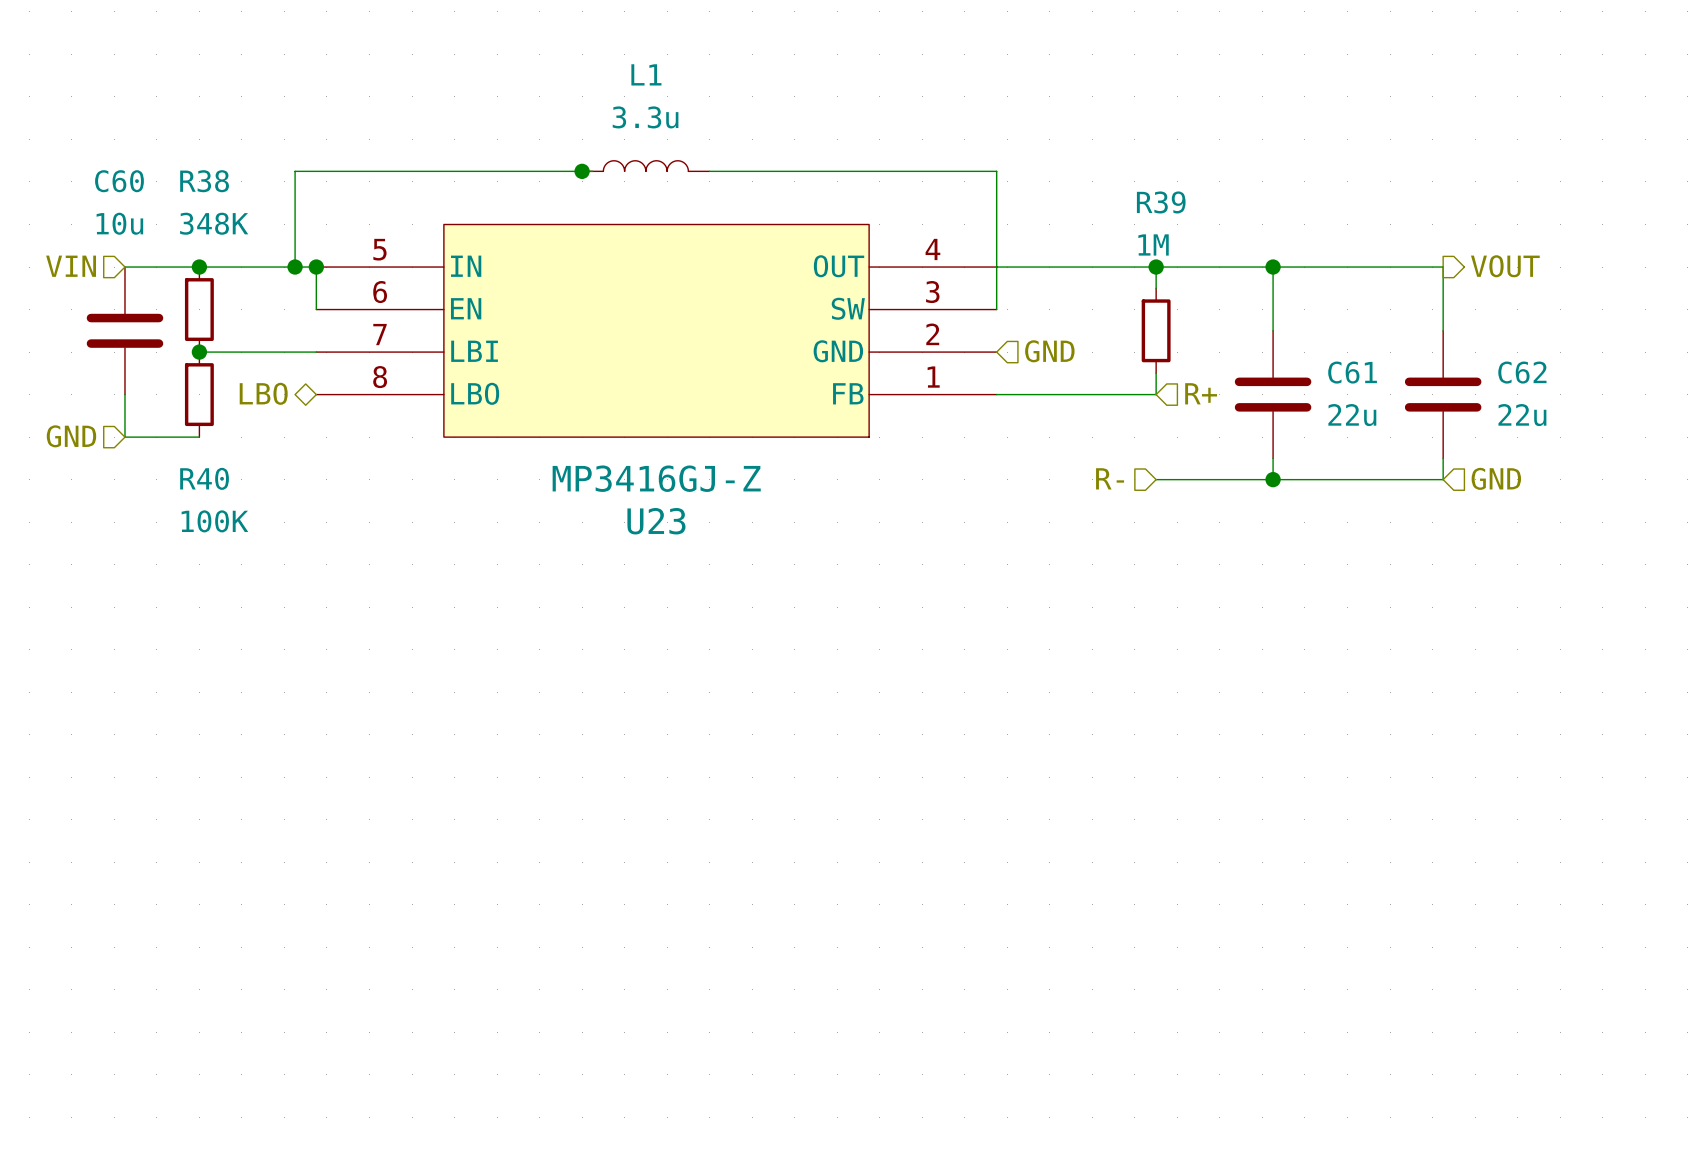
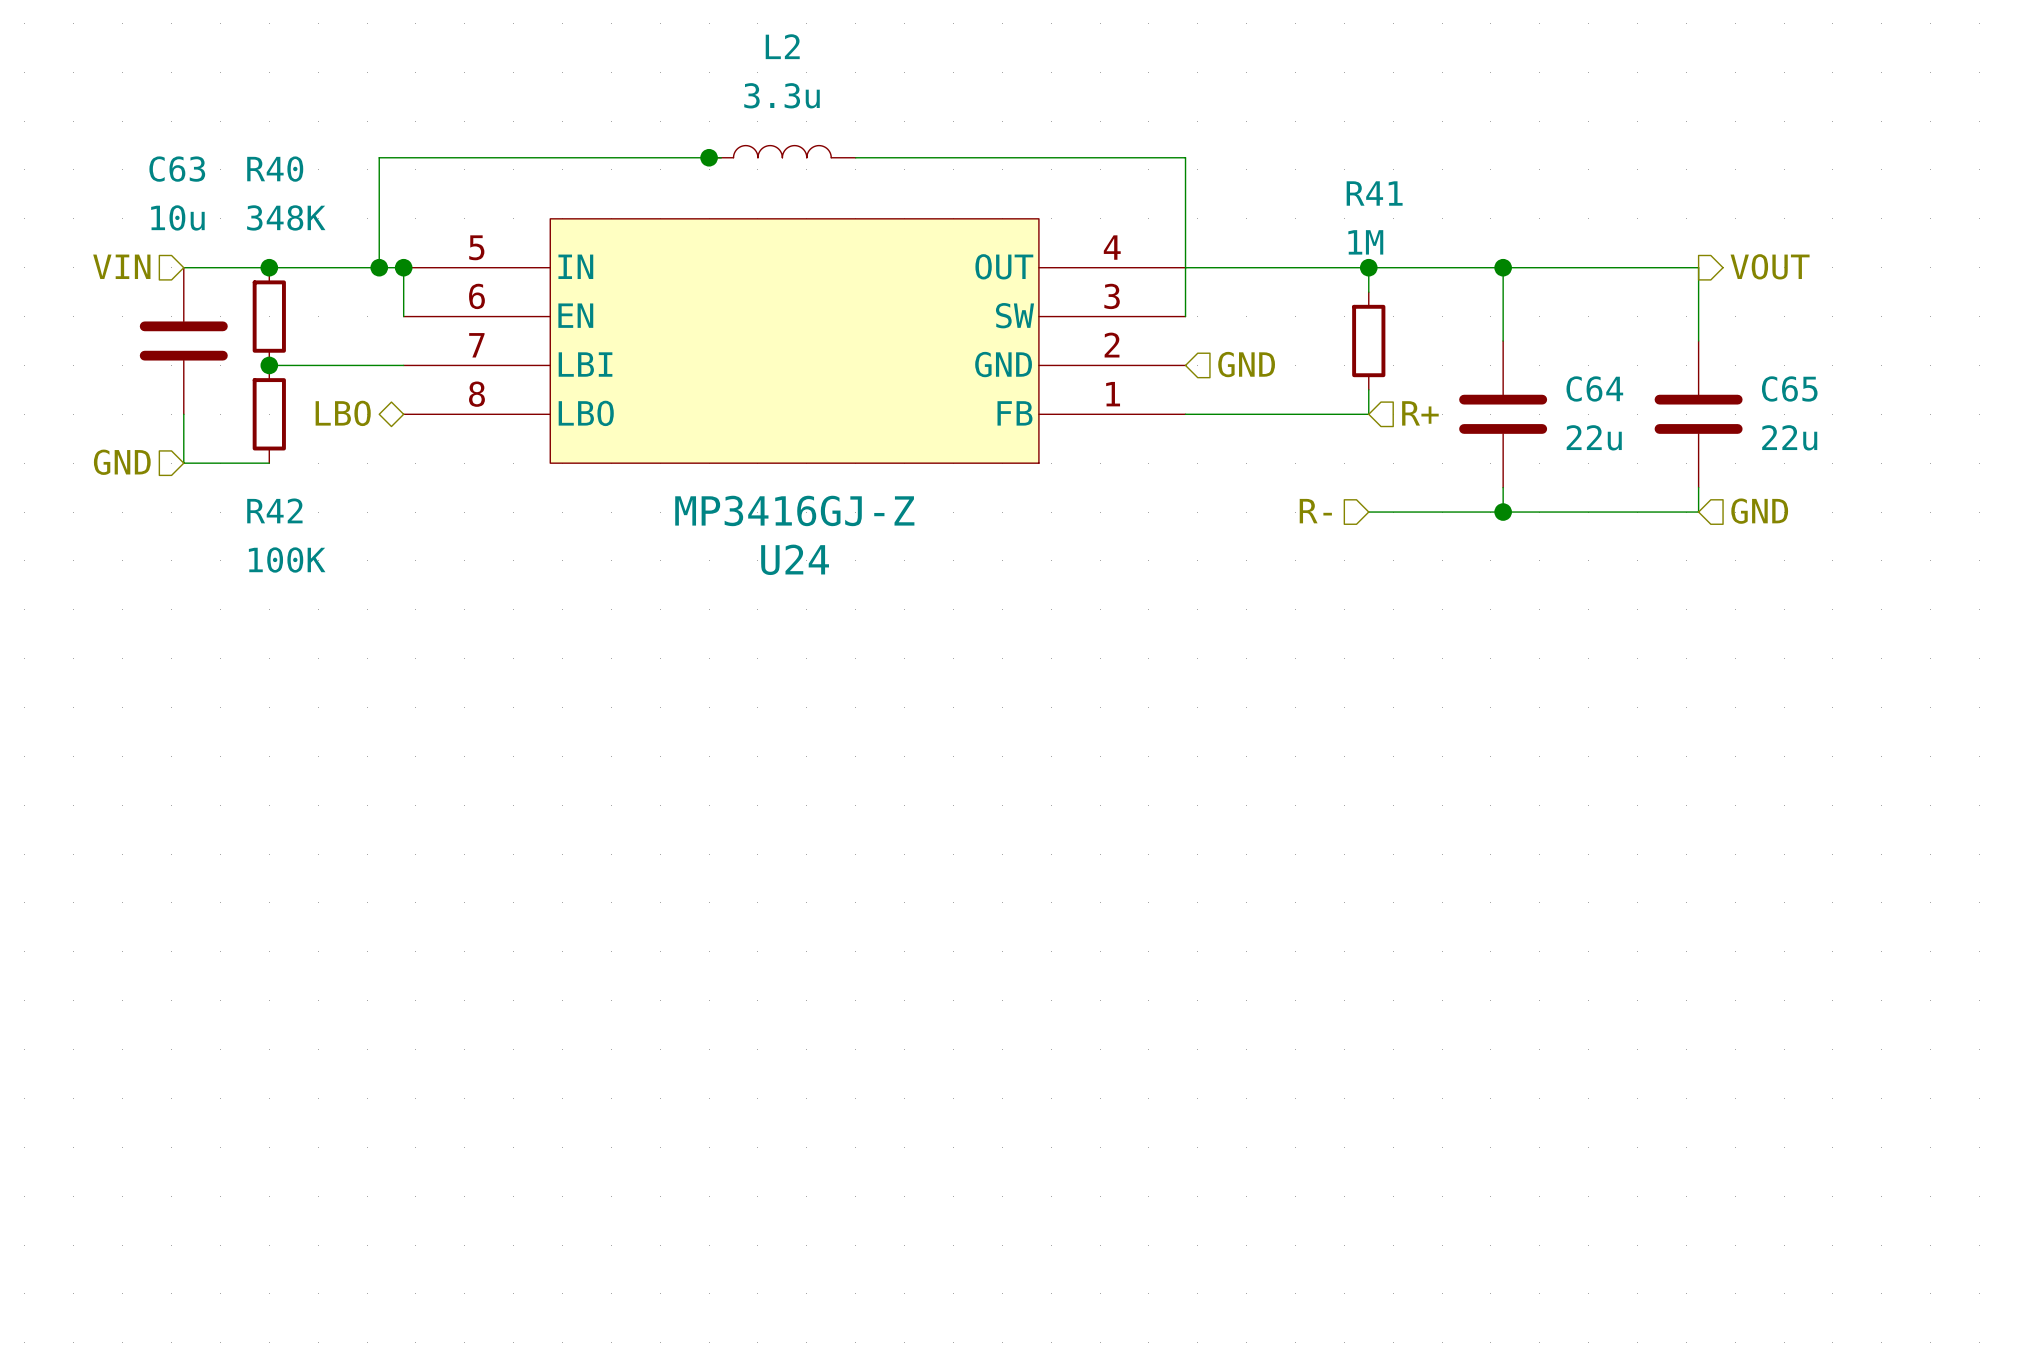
L1 name: L1 (646, 74) -> L2 (782, 46)
C60 name: C60 (119, 181) -> C63 (177, 169)
R38 name: R38 (204, 181) -> R40 (275, 169)
R39 name: R39 (1161, 202) -> R41 (1374, 193)
C61 name: C61 (1352, 372) -> C64 (1594, 388)
C62 name: C62 (1522, 372) -> C65 (1789, 388)
R40 name: R40 (204, 478) -> R42 (274, 510)
U23 name: U23 (656, 521) -> U24 (795, 559)

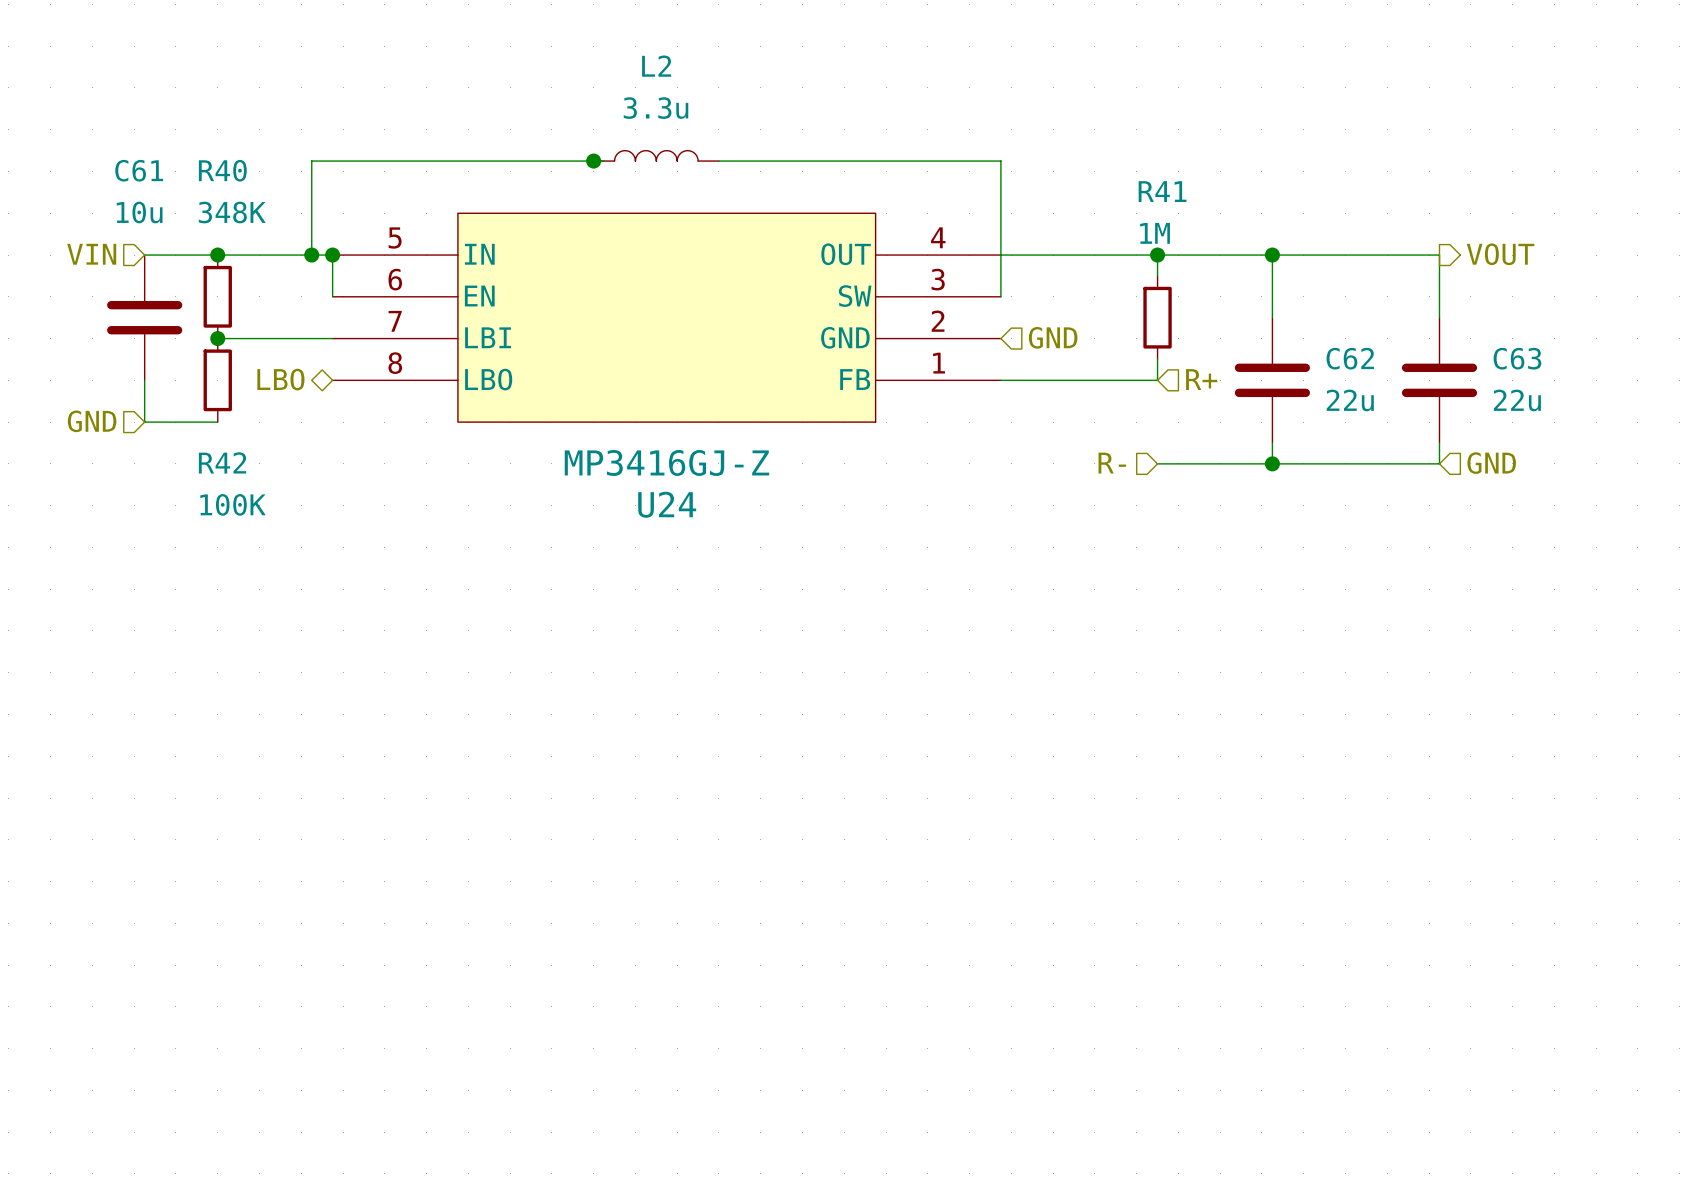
C63 name: C63 (177, 169) -> C61 (139, 170)
C64 name: C64 (1594, 388) -> C62 (1350, 358)
C65 name: C65 (1789, 388) -> C63 (1517, 358)

